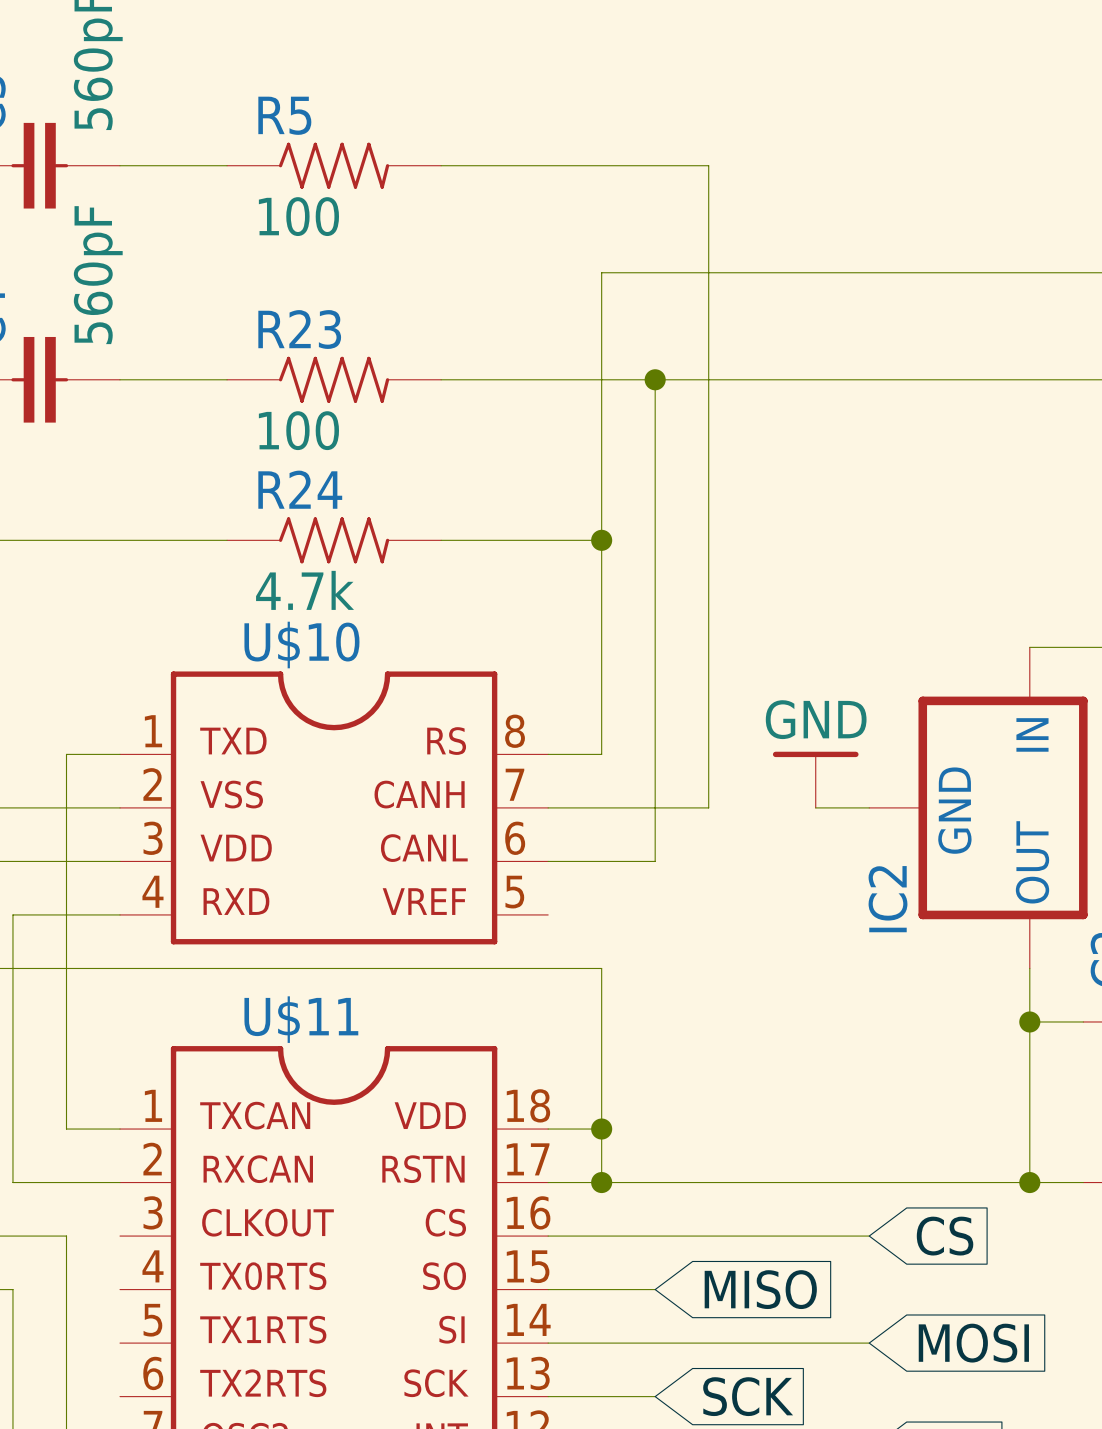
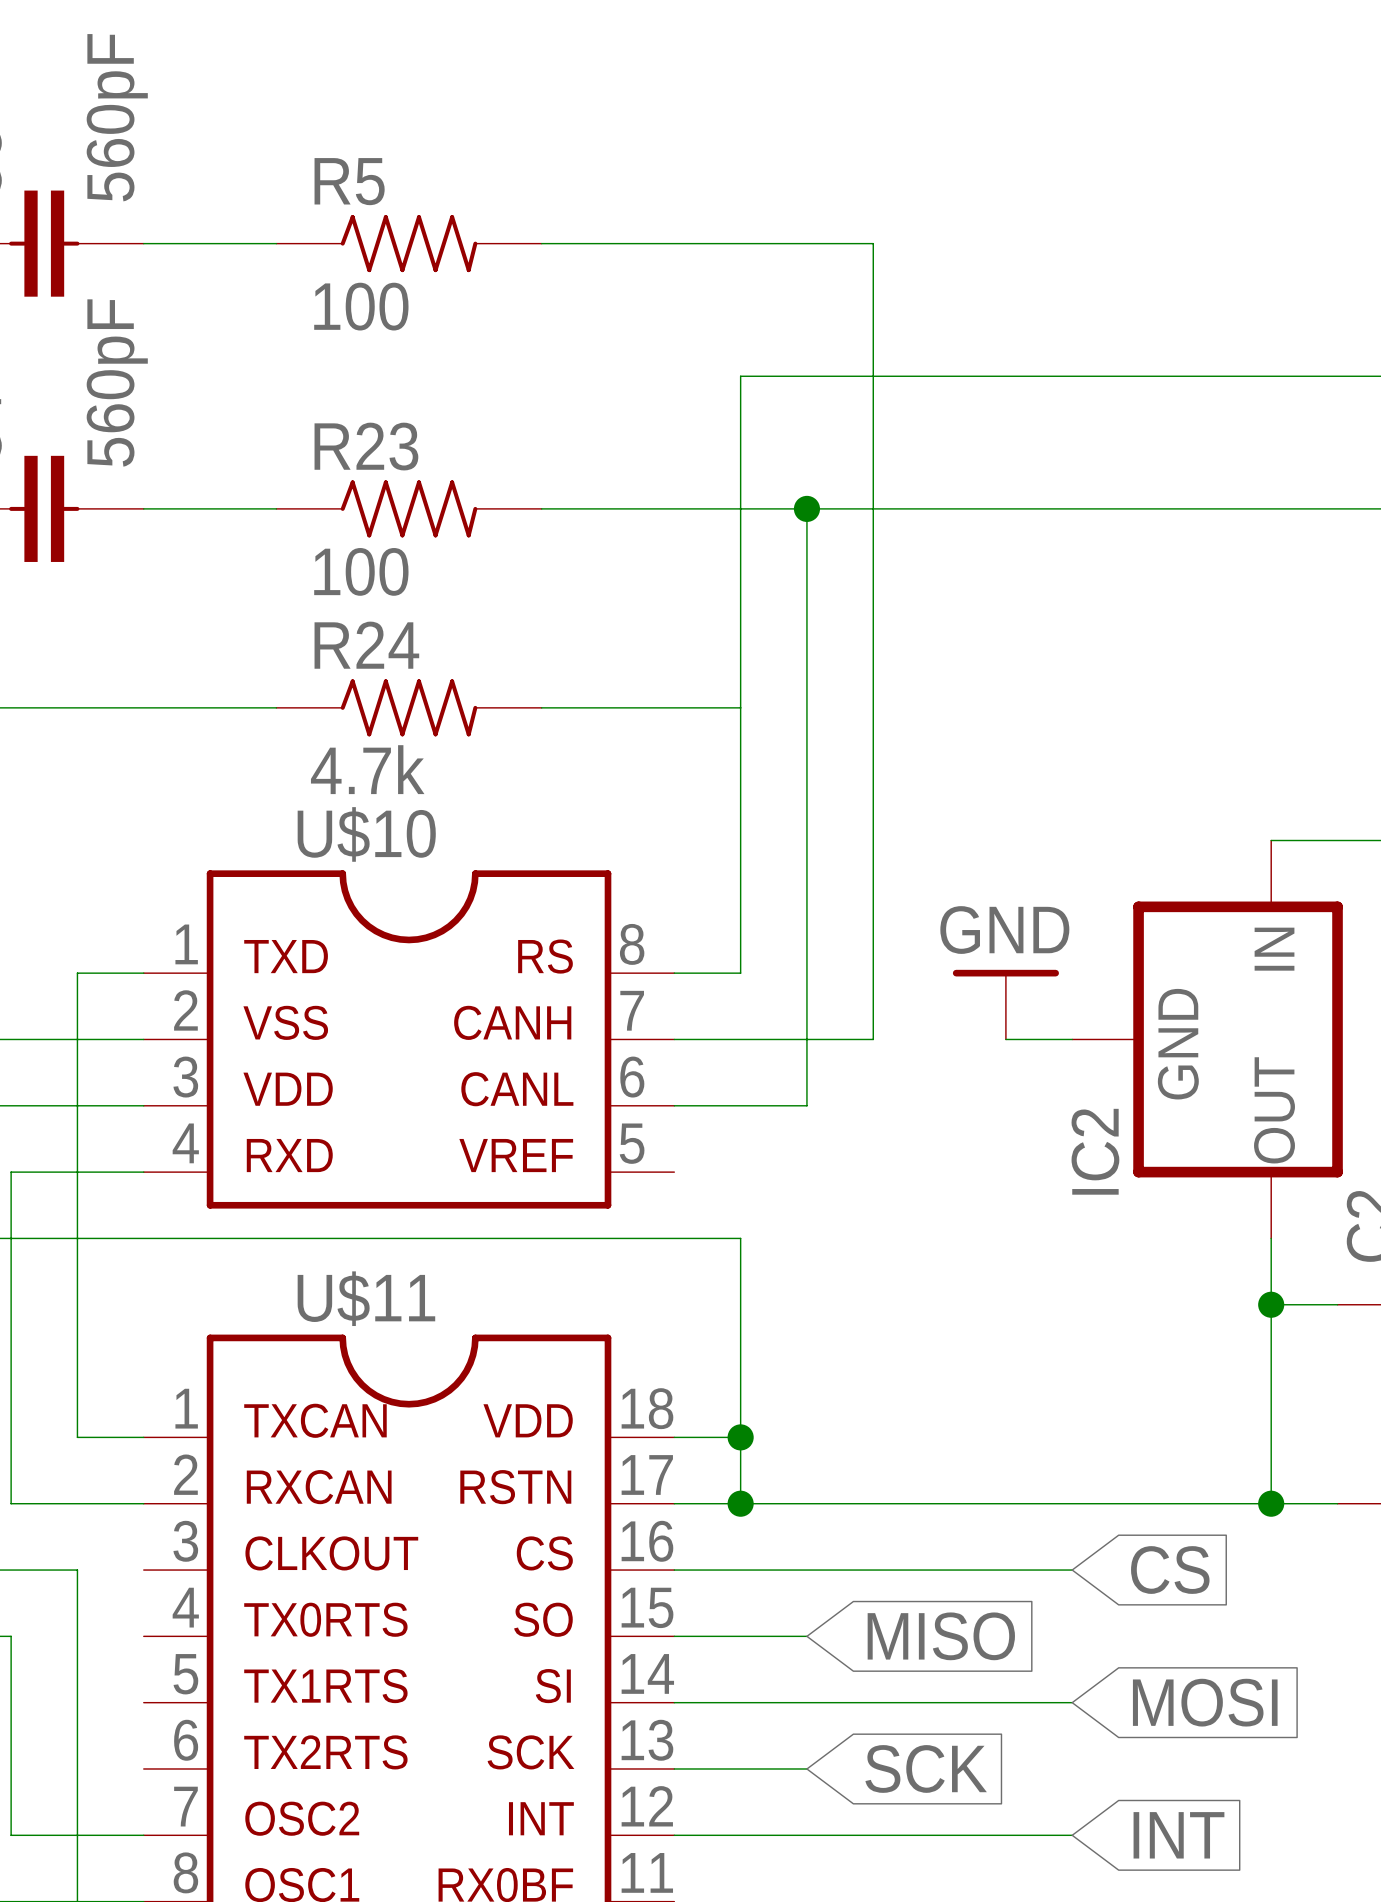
junction: (601, 540) -> none

